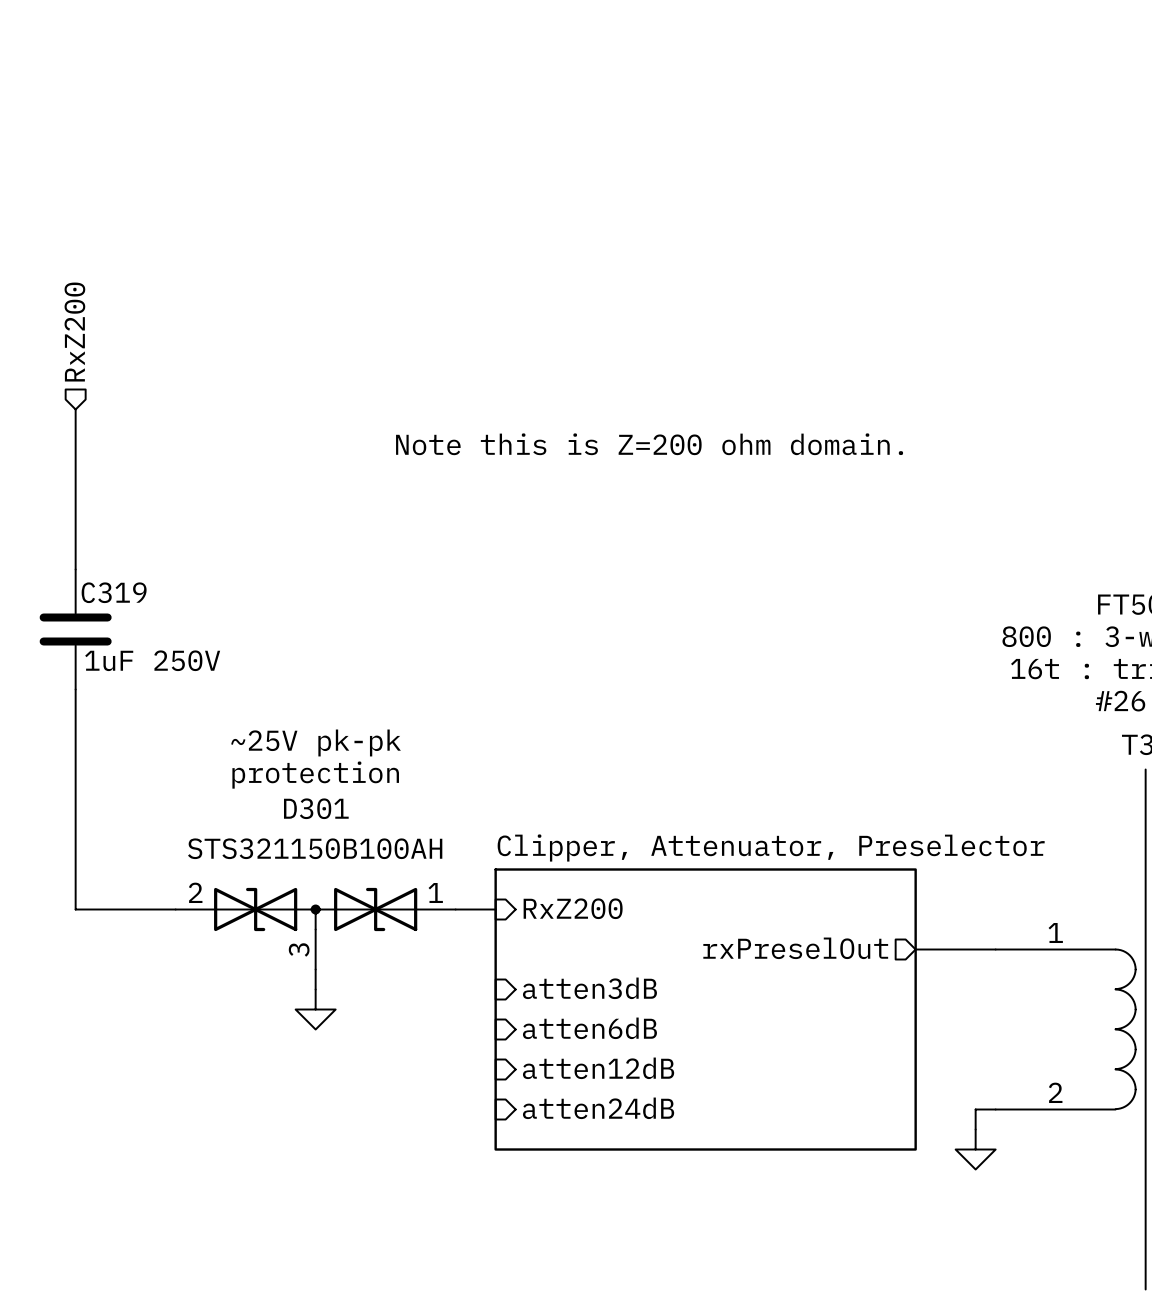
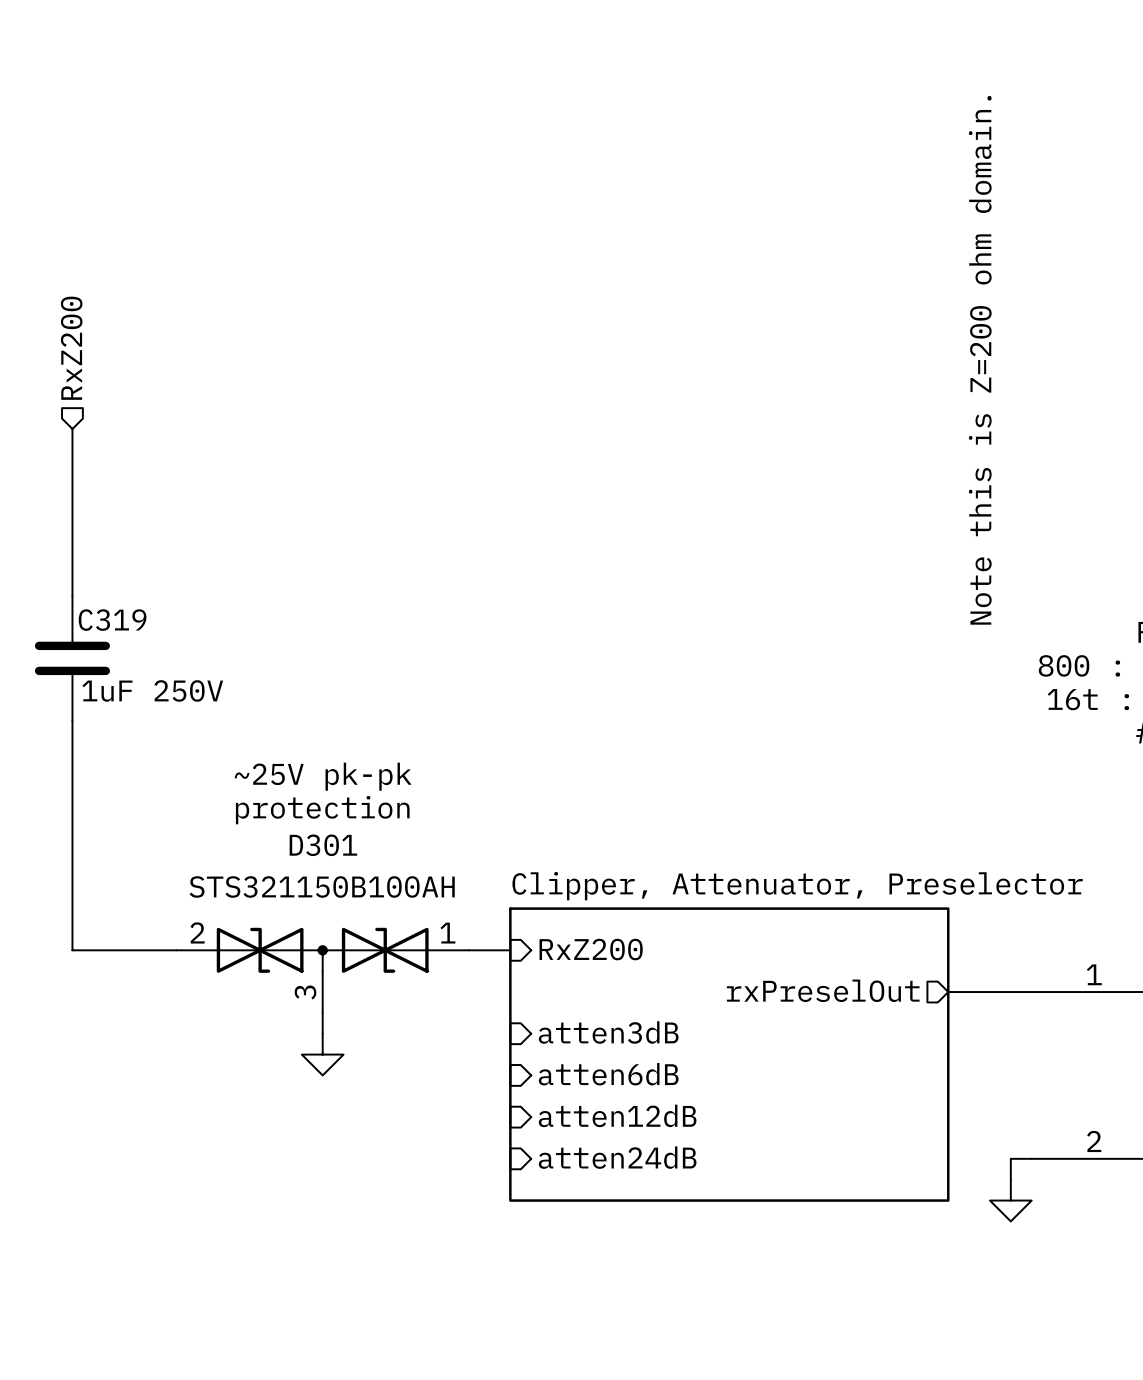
text rotation: 0° (649, 444) -> 90° counterclockwise (980, 360)

